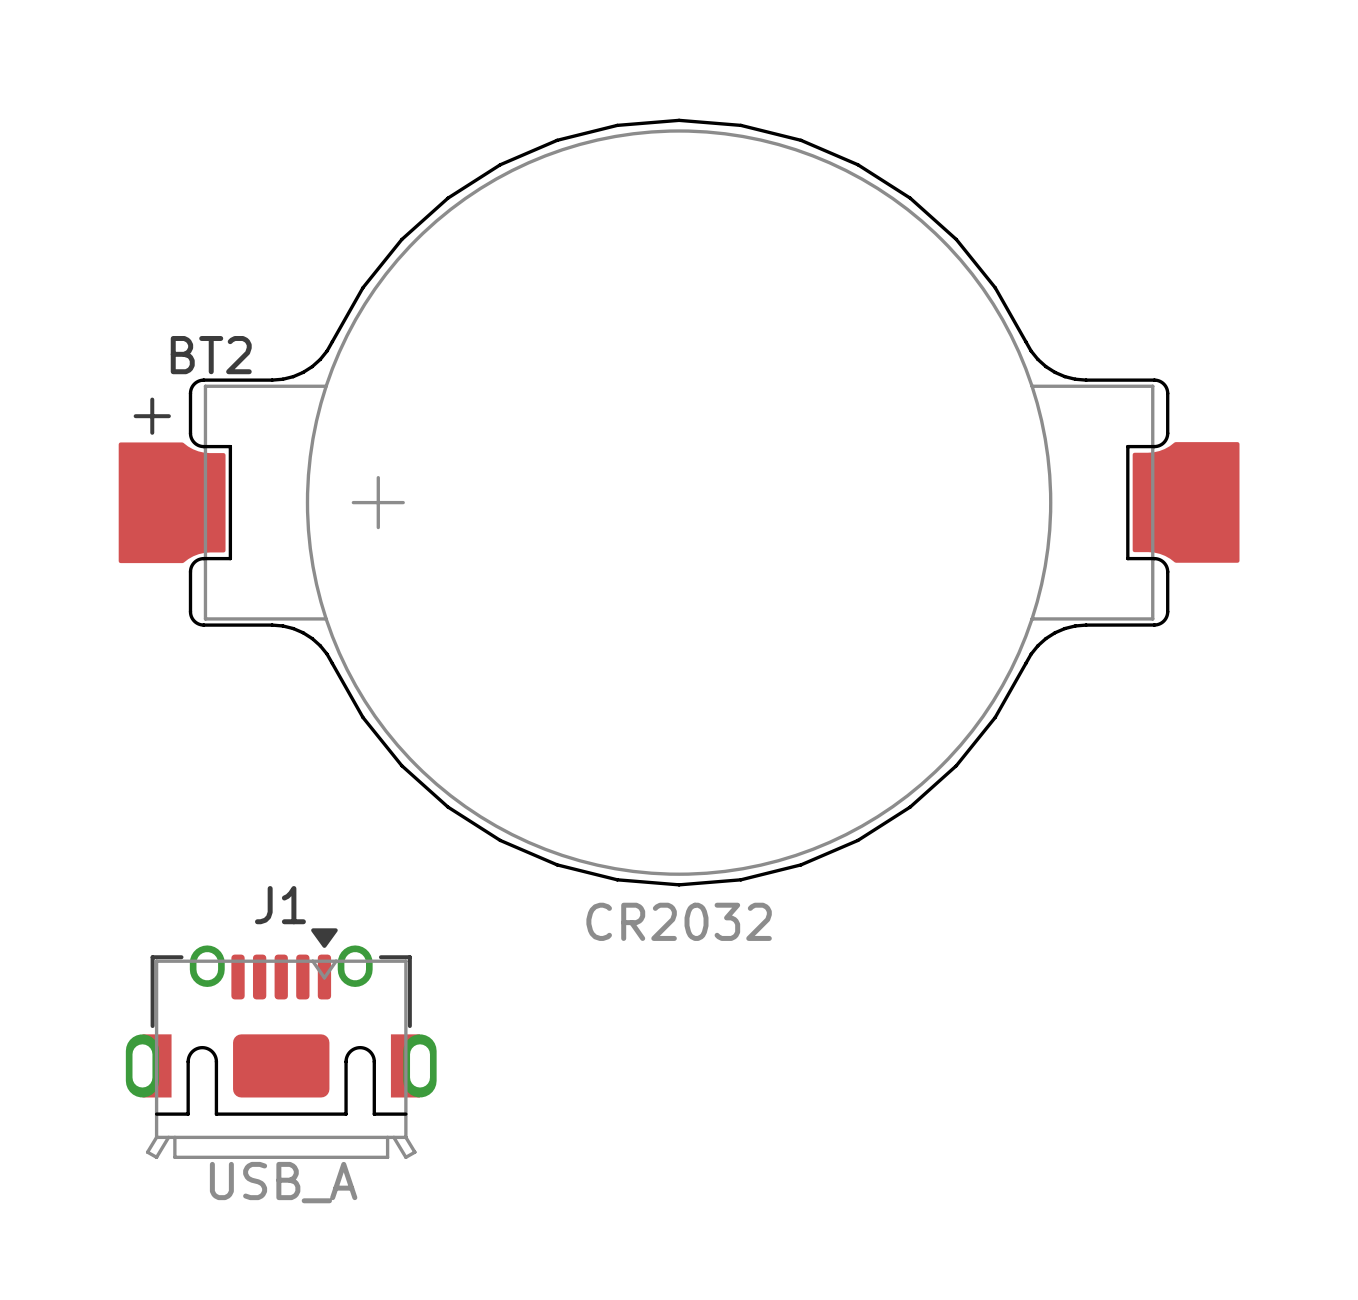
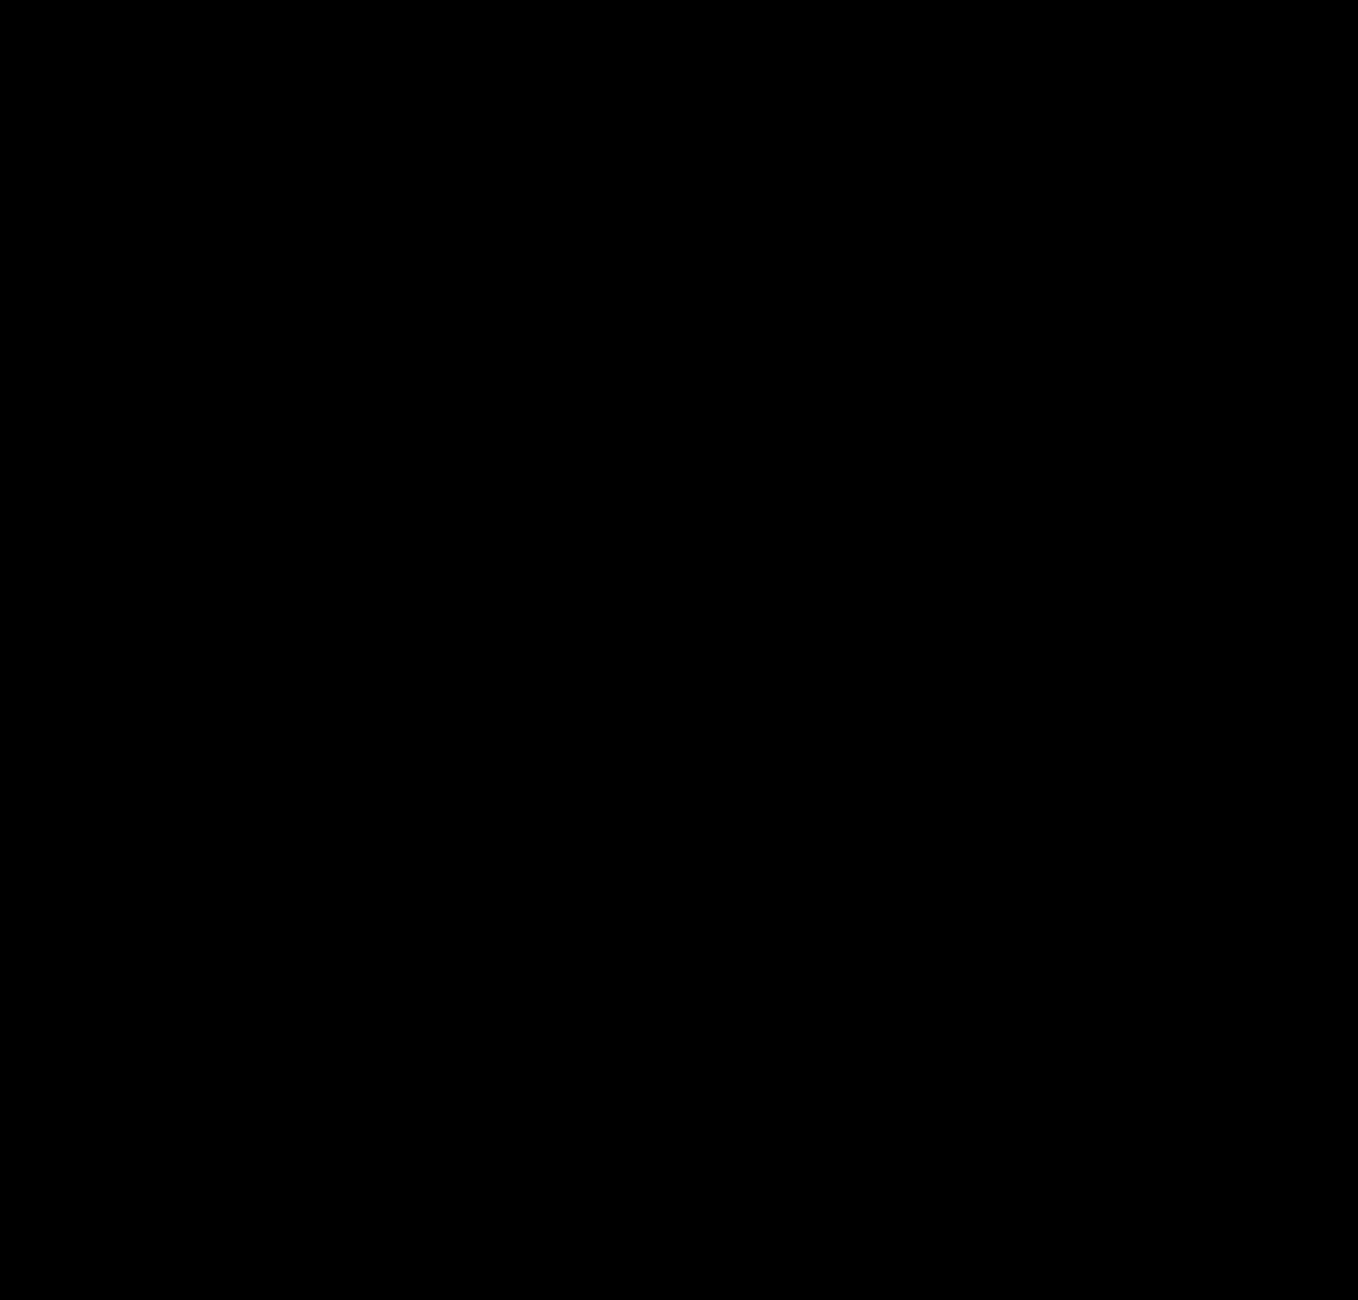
BT2: CR2032 (679, 502) -> none
J1: USB_A (281, 1043) -> none

